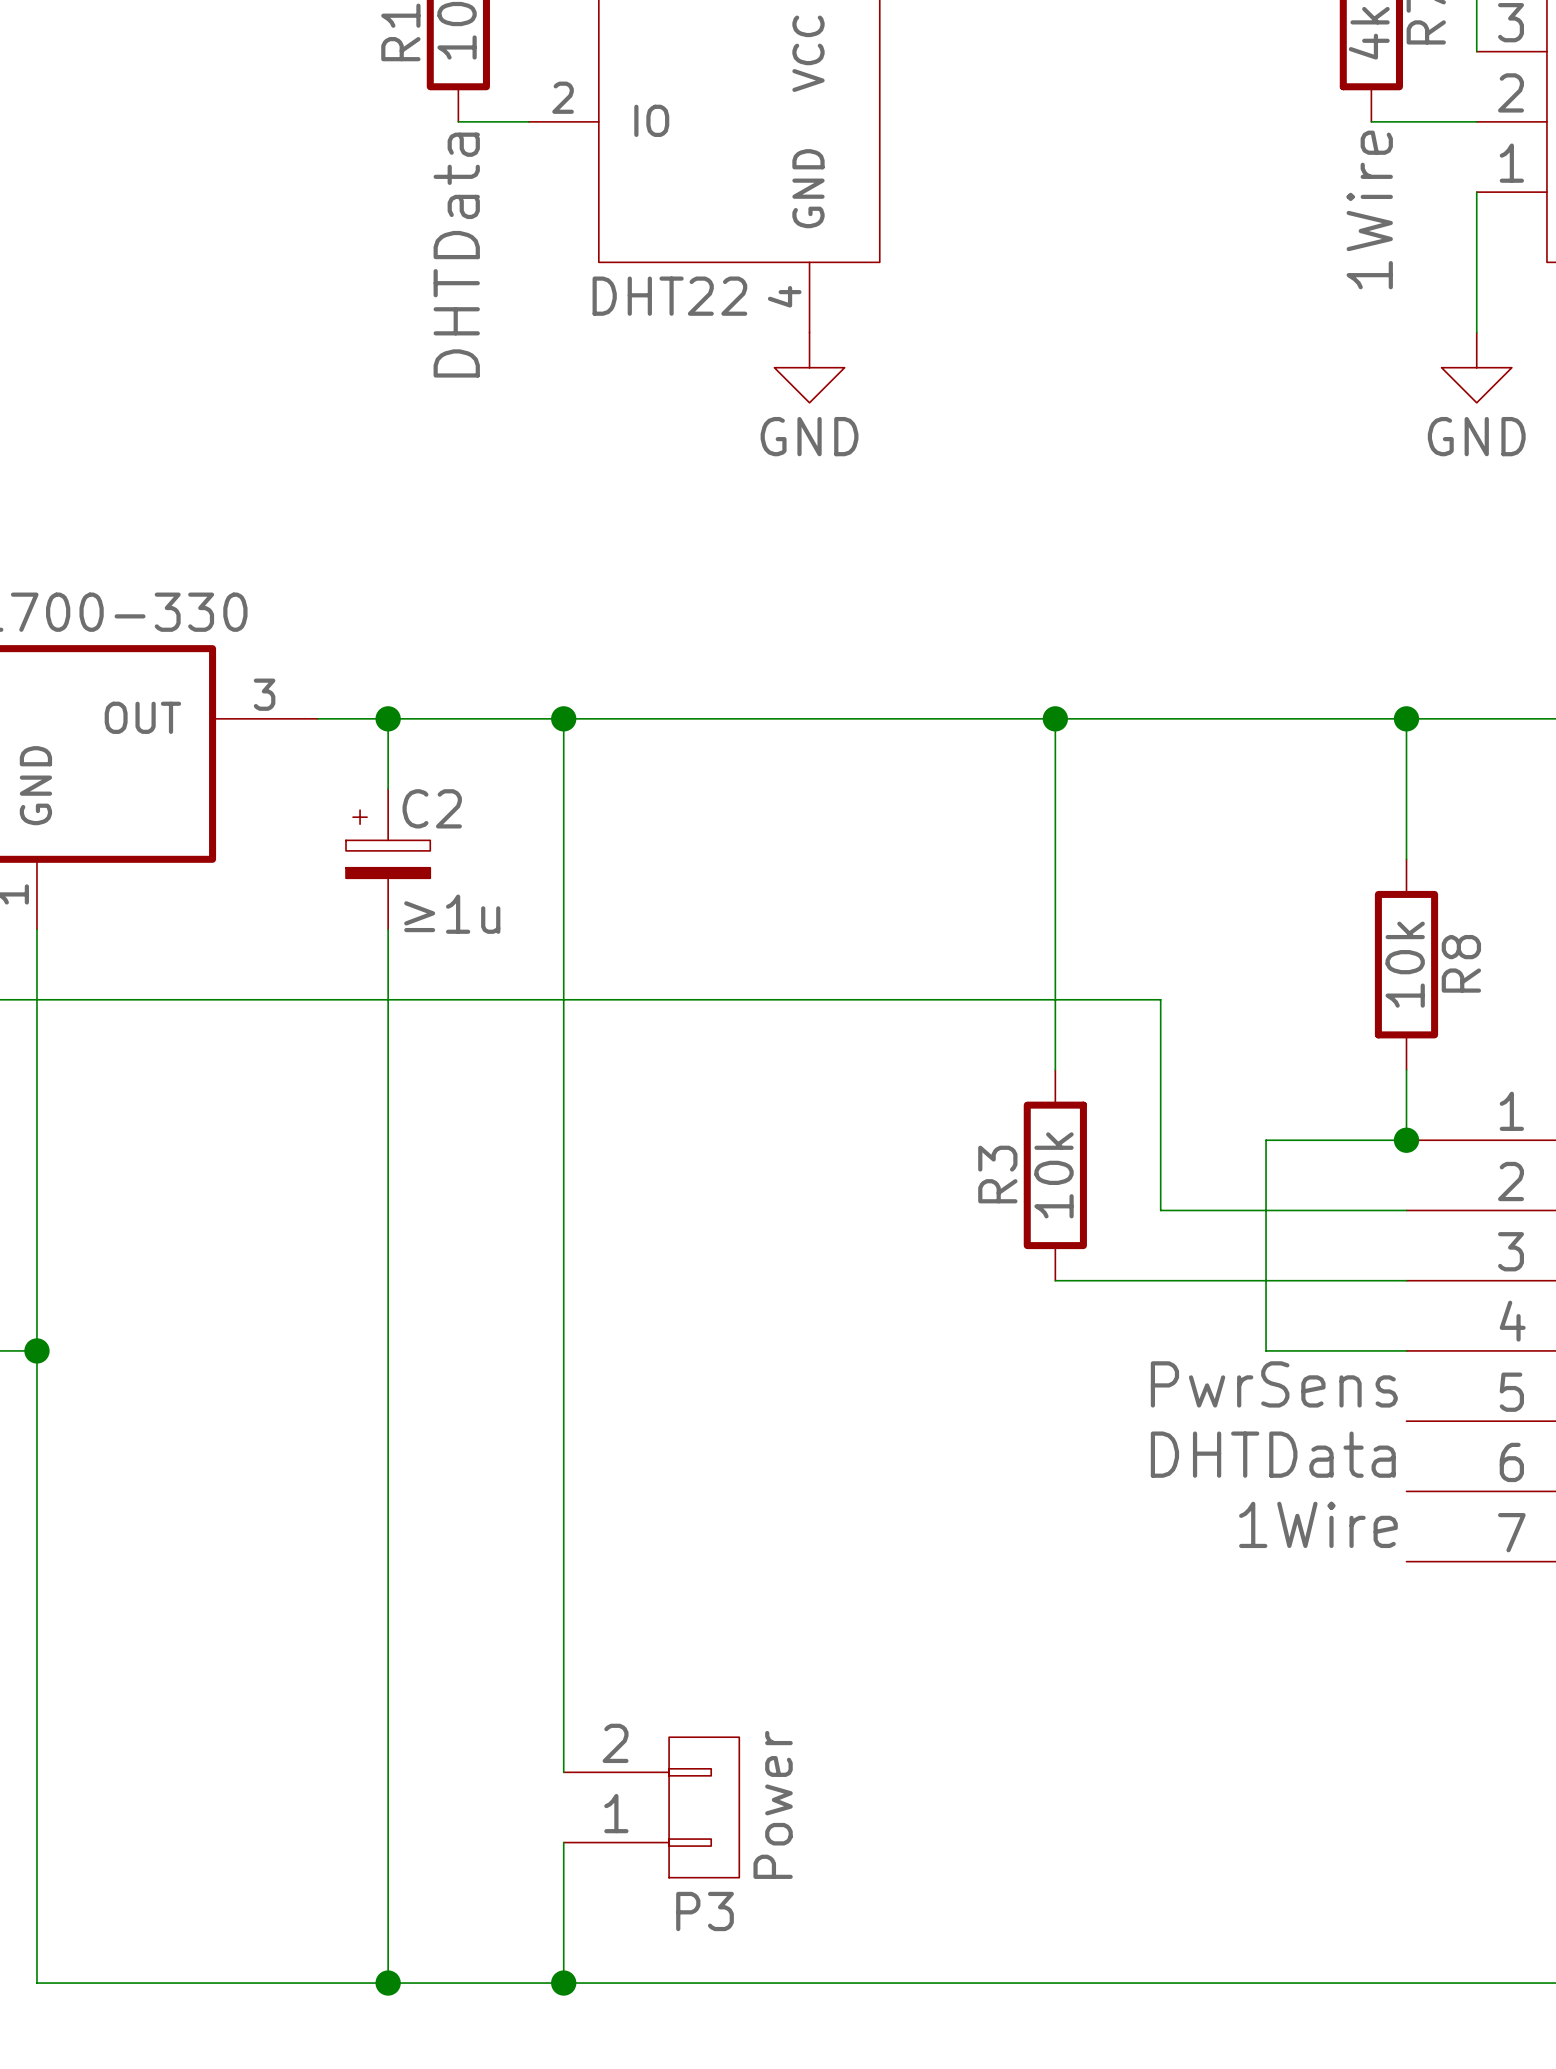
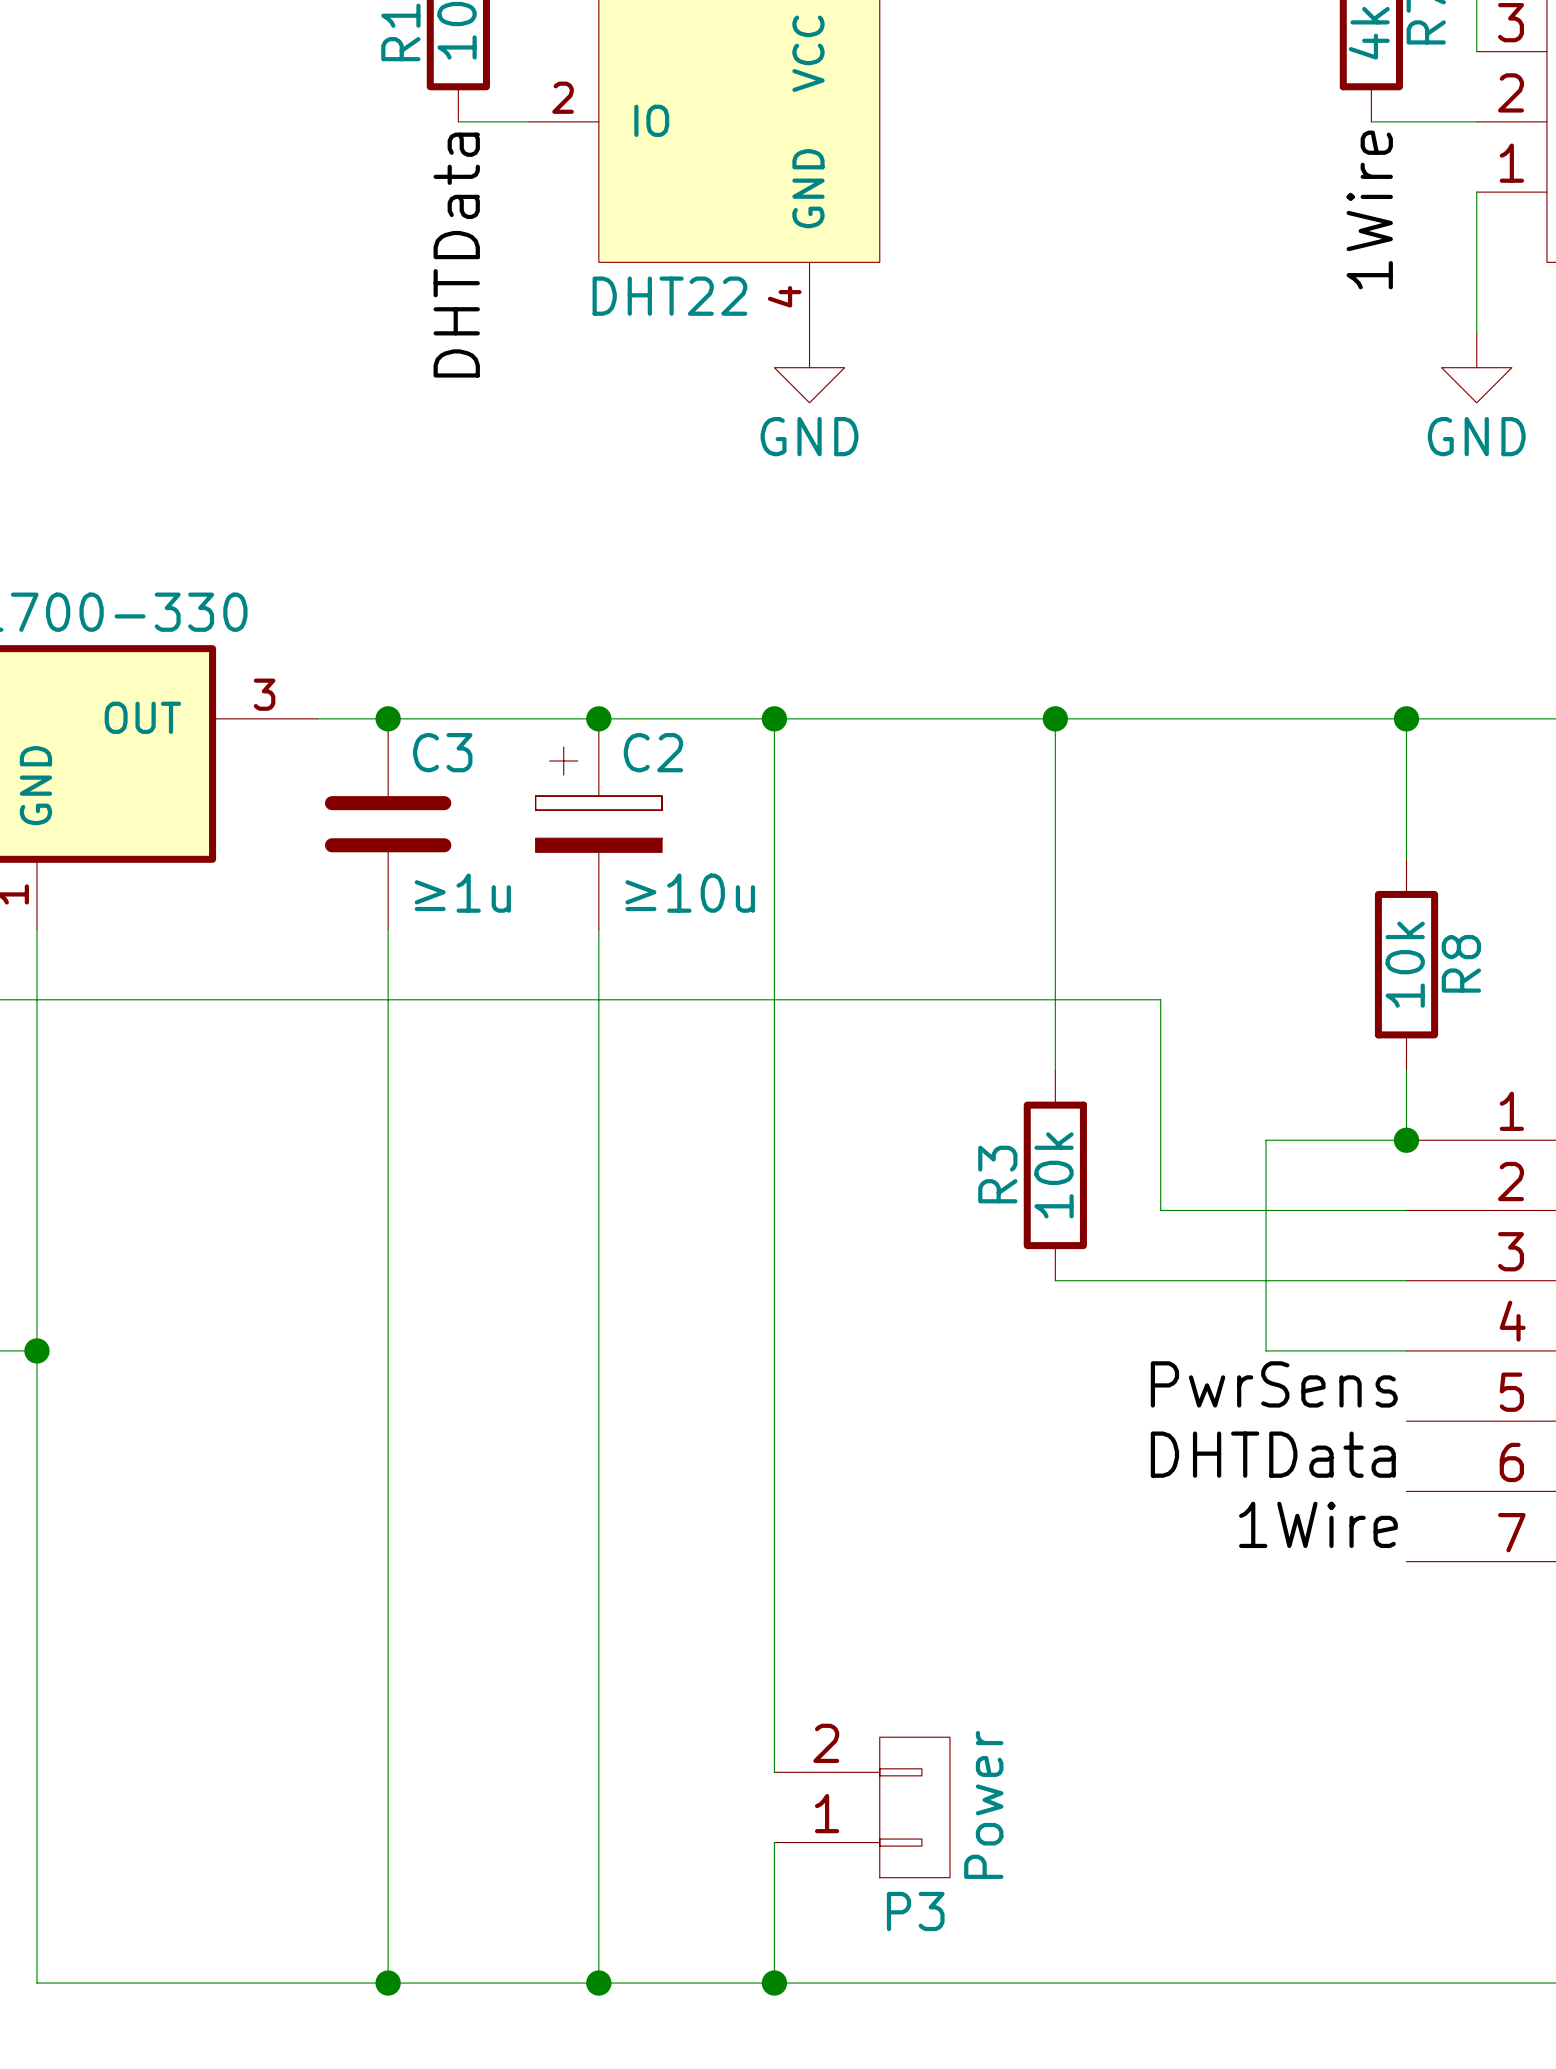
wire: (563, 718) (563, 1772) -> (774, 718) (774, 1772)
junction position: (563, 718) -> (598, 718)
junction: none -> (774, 718)
C2 symbol: [346, 789, 431, 930] -> [535, 718, 663, 930]
C3: none -> ≥1u (388, 824)
C2 value: ≥1u (452, 914) -> ≥10u (690, 893)
wire: none -> (598, 929) (598, 1983)
P3 position: (651, 1807) -> (862, 1807)
wire: (563, 1842) (563, 1983) -> (774, 1842) (774, 1983)
junction position: (563, 1983) -> (598, 1983)
junction: none -> (774, 1983)

